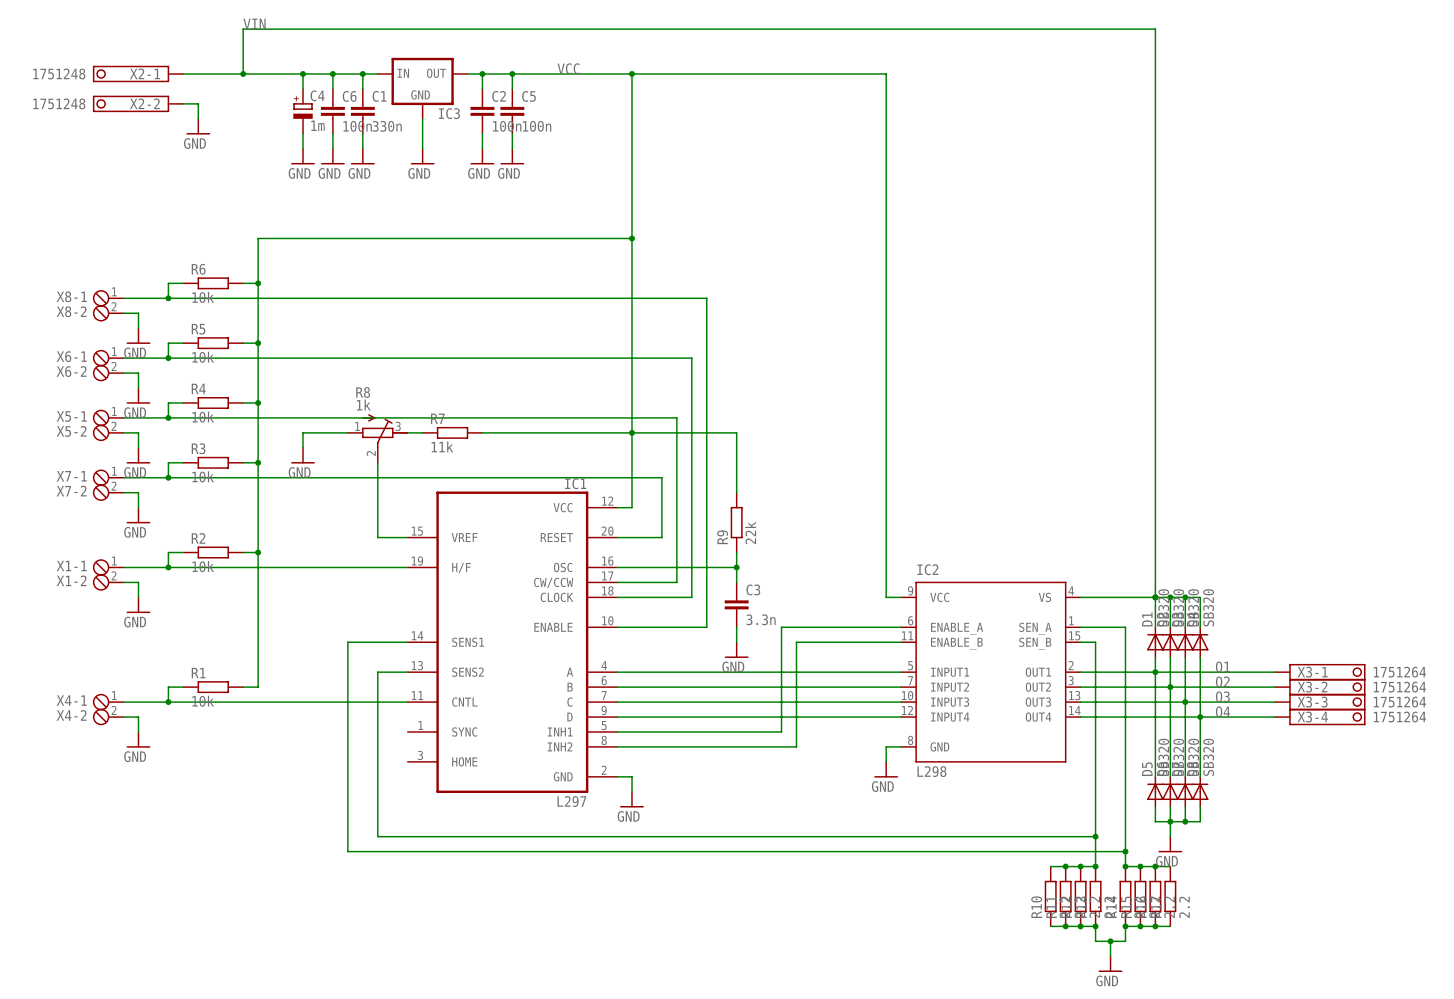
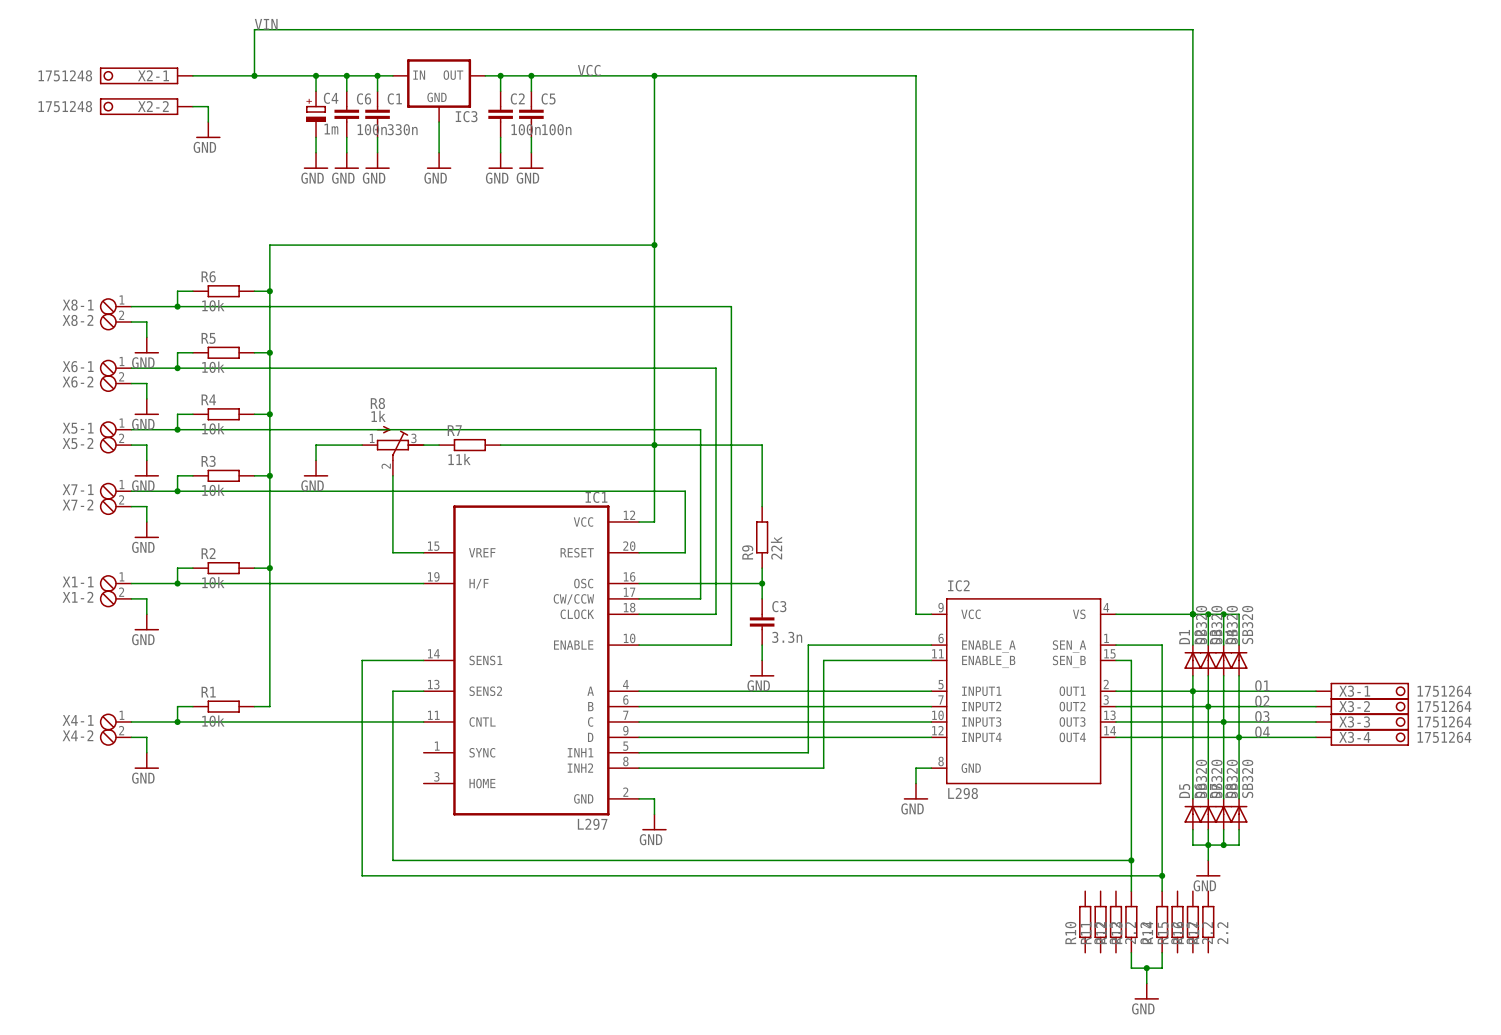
wire: (1050, 866) (1095, 866) -> none
junction: (1065, 866) -> none
junction: (1080, 866) -> none
junction: (1095, 866) -> none
wire: (1125, 866) (1170, 866) -> none
junction: (1125, 866) -> none
junction: (1140, 866) -> none
junction: (1155, 866) -> none
wire: (1050, 926) (1095, 926) -> none
junction: (1065, 926) -> none
junction: (1080, 926) -> none
junction: (1095, 926) -> none
wire: (1125, 926) (1170, 926) -> none
junction: (1125, 926) -> none
junction: (1140, 926) -> none
junction: (1155, 926) -> none

